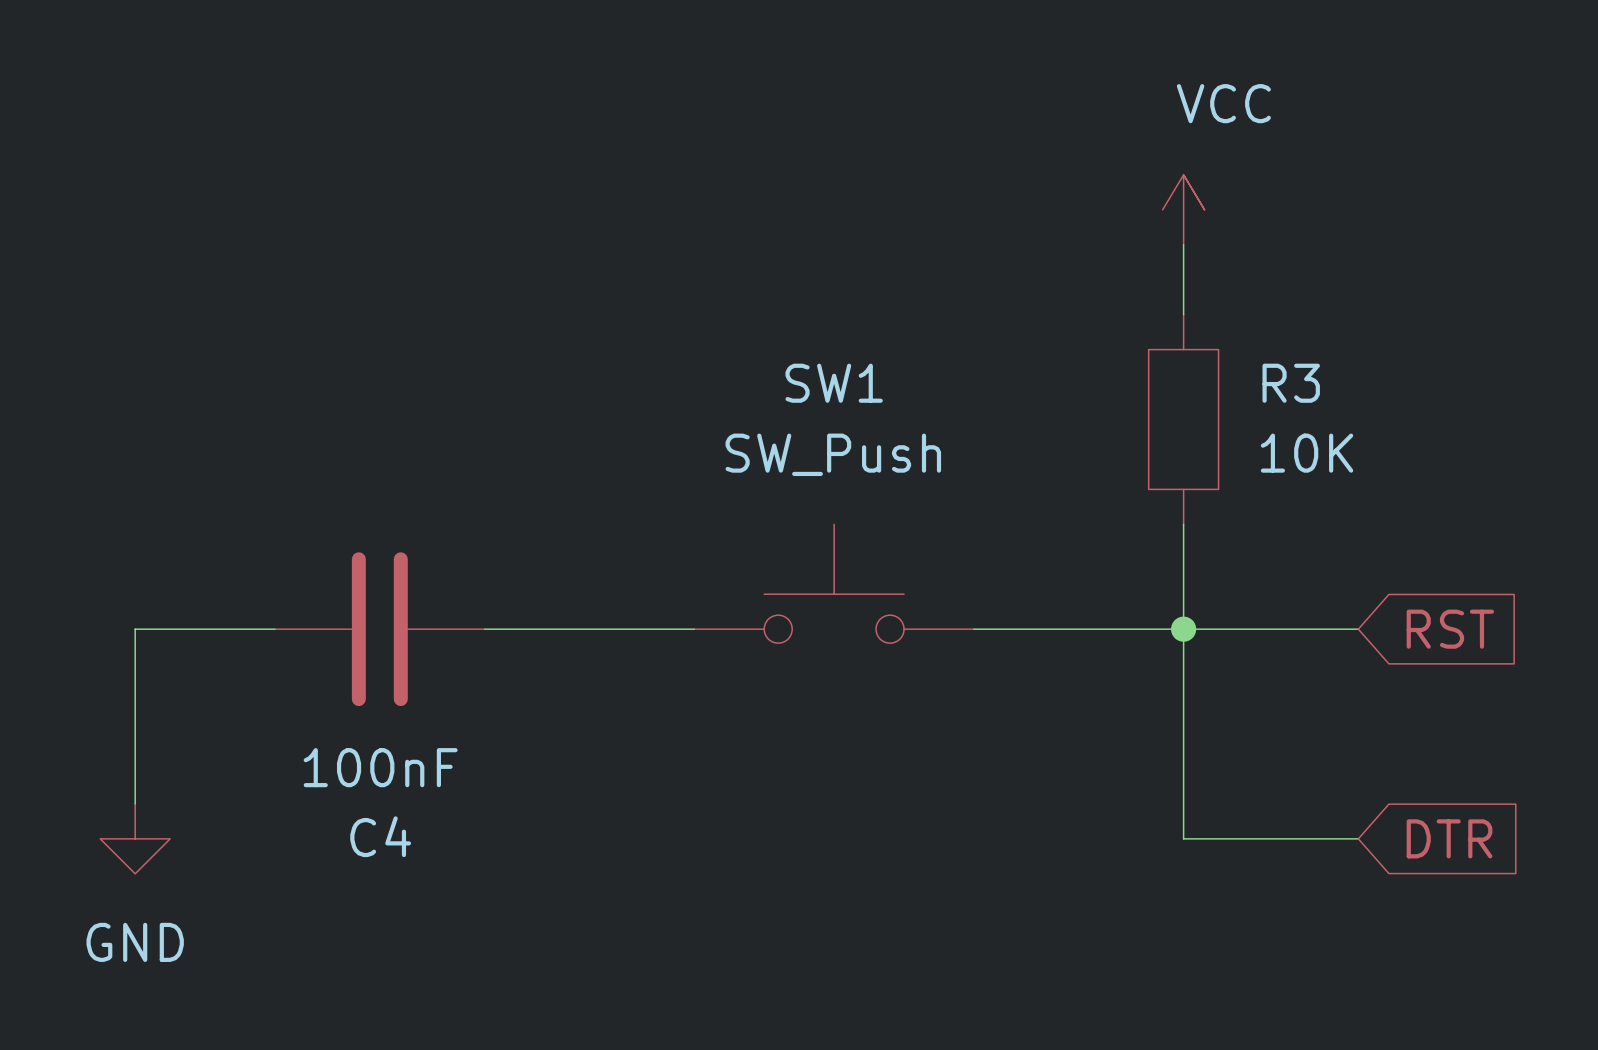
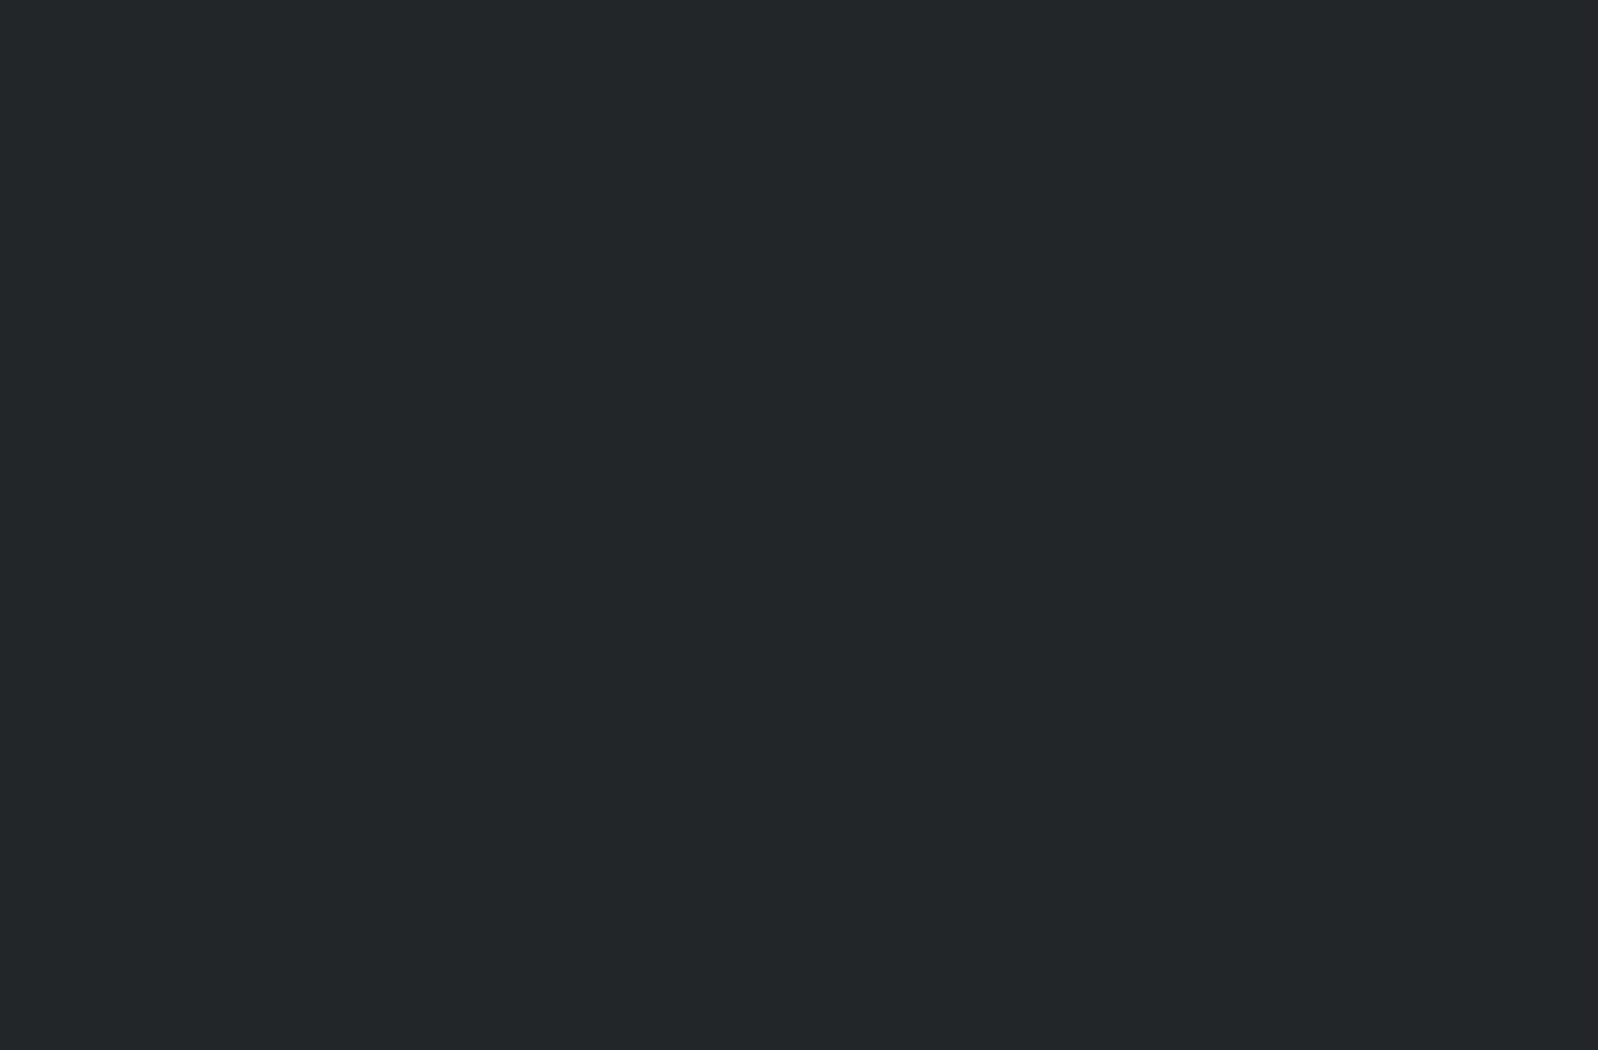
power symbol: VCC (1225, 209) -> none
wire: (1183, 244) (1183, 314) -> none
R3: 10K (1183, 419) -> none
wire: (1183, 524) (1183, 838) (1358, 838) -> none
SW1: SW_Push (834, 583) -> none
wire: (274, 629) (135, 629) (135, 803) -> none
C4: 100nF (379, 629) -> none
wire: (484, 629) (694, 629) -> none
wire: (973, 629) (1358, 629) -> none
junction: (1183, 629) -> none
global label: RST (1450, 629) -> none
power symbol: GND (135, 838) -> none
global label: DTR (1449, 838) -> none

